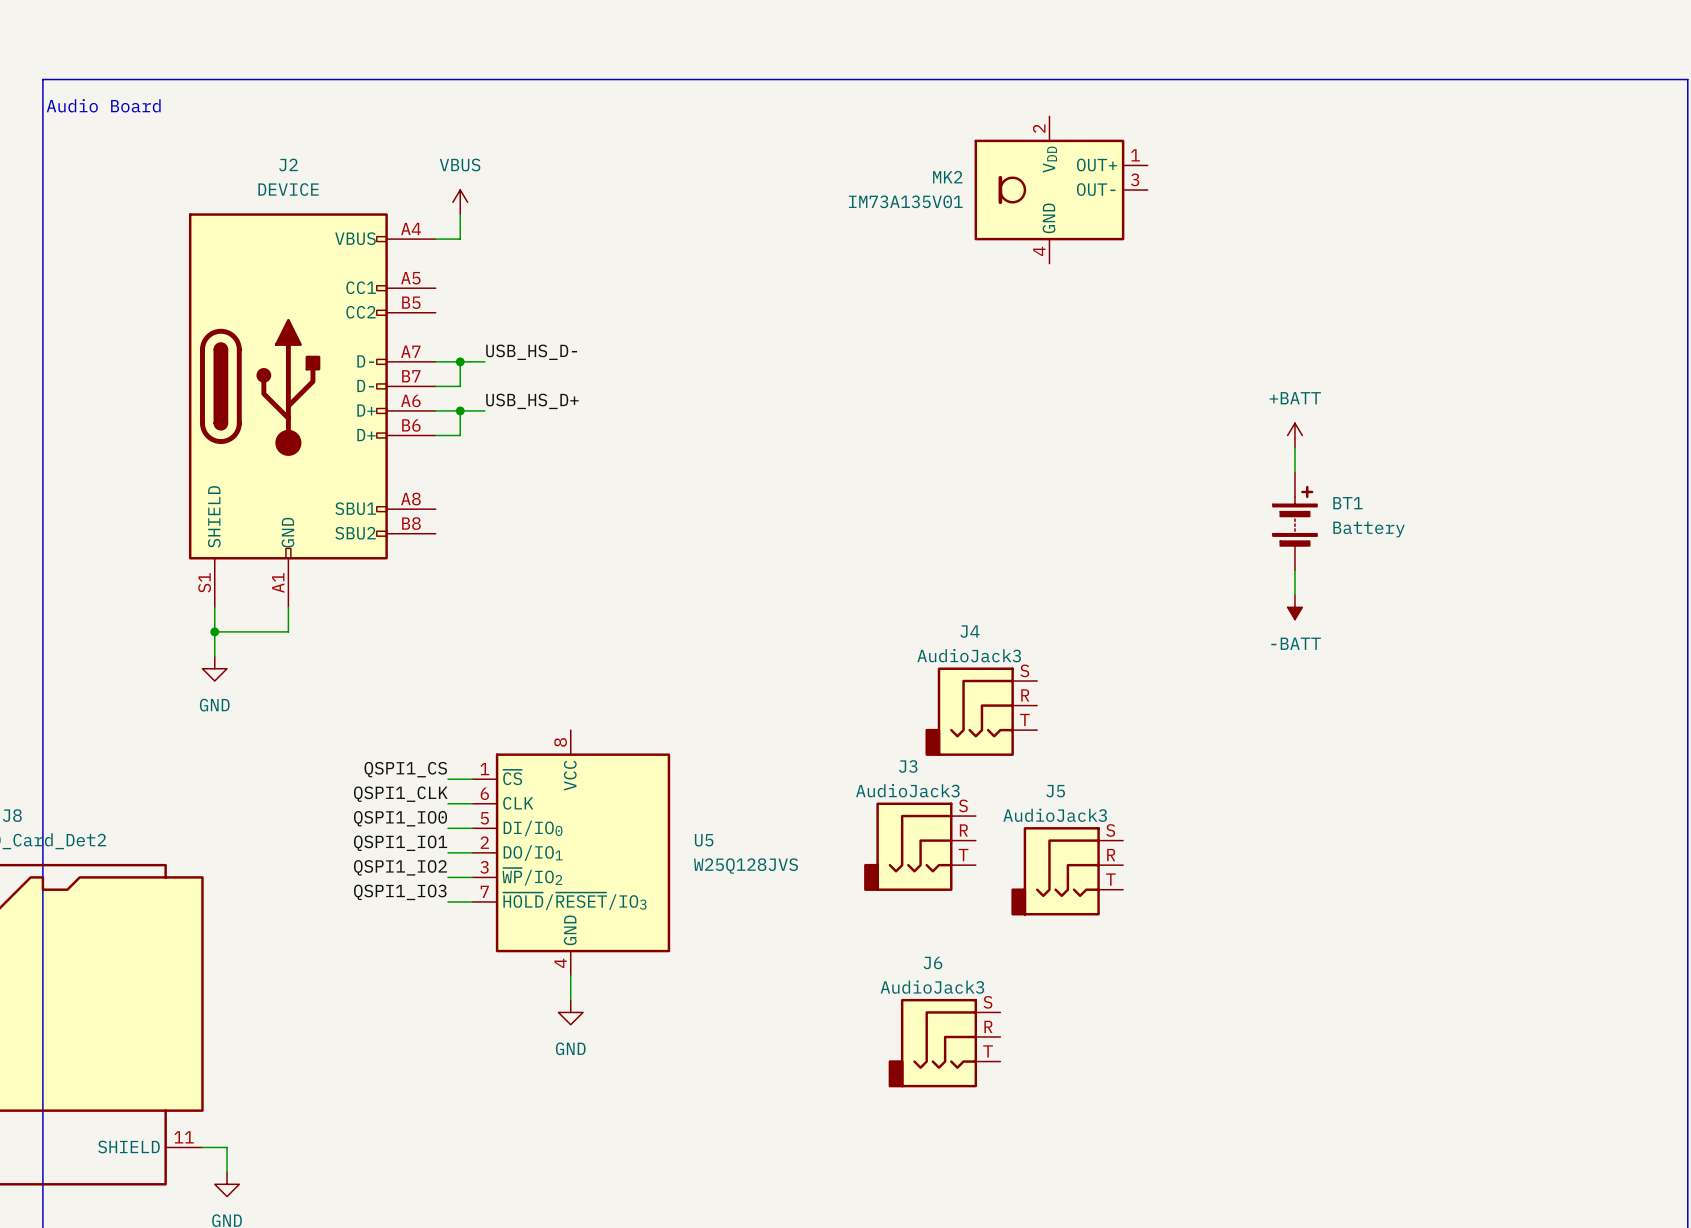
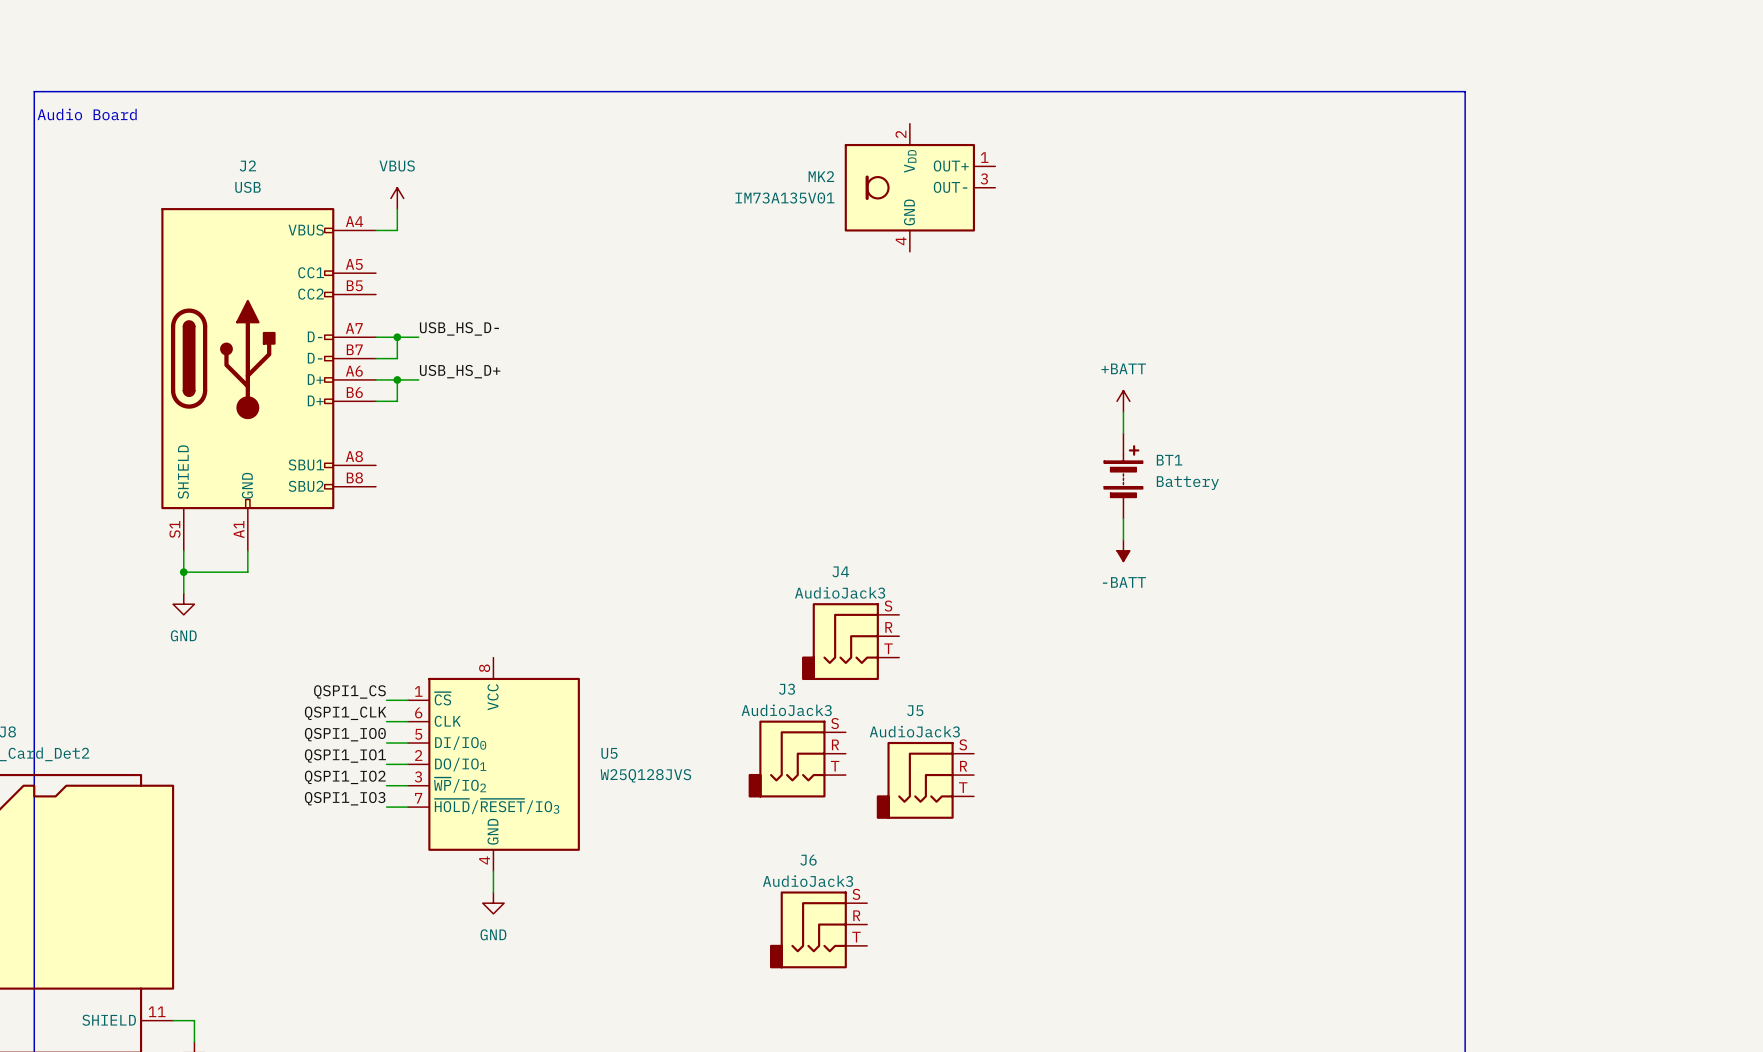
J2 value: DEVICE (288, 189) -> USB (248, 187)

